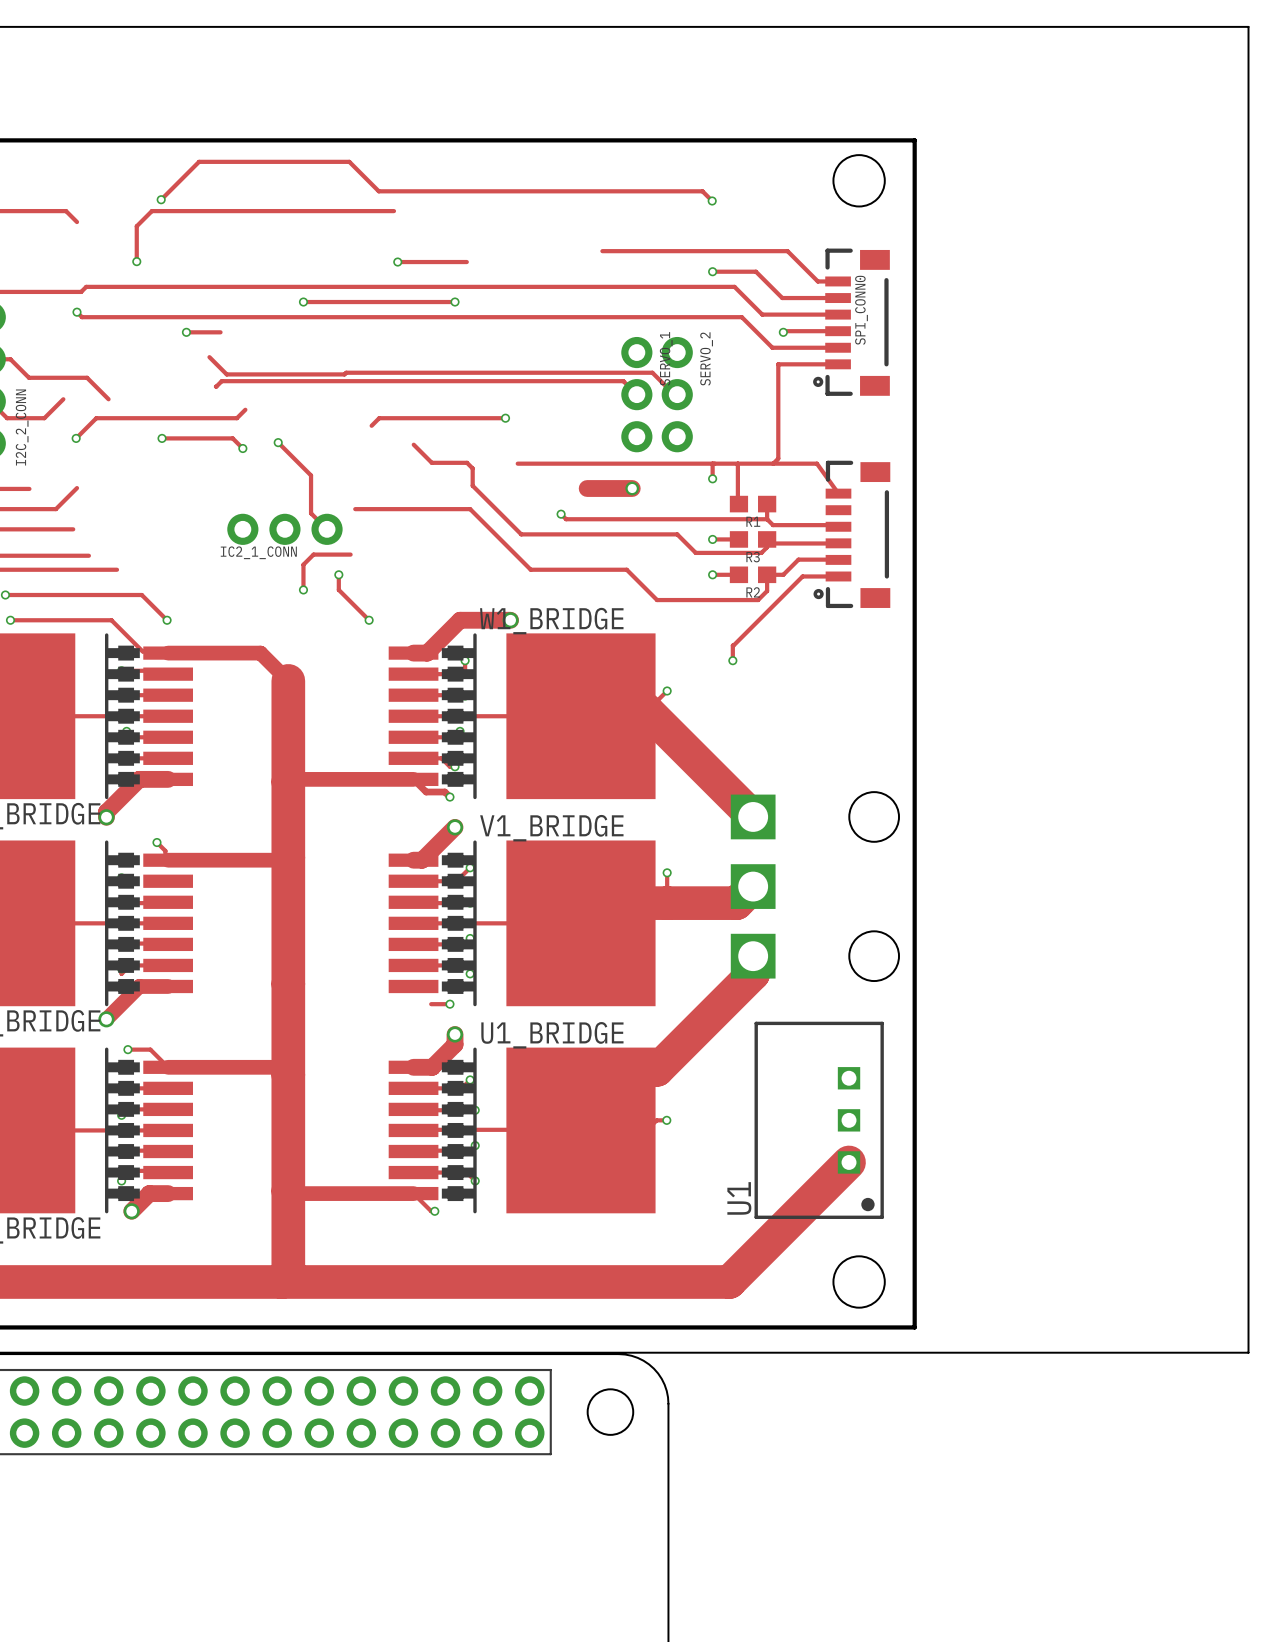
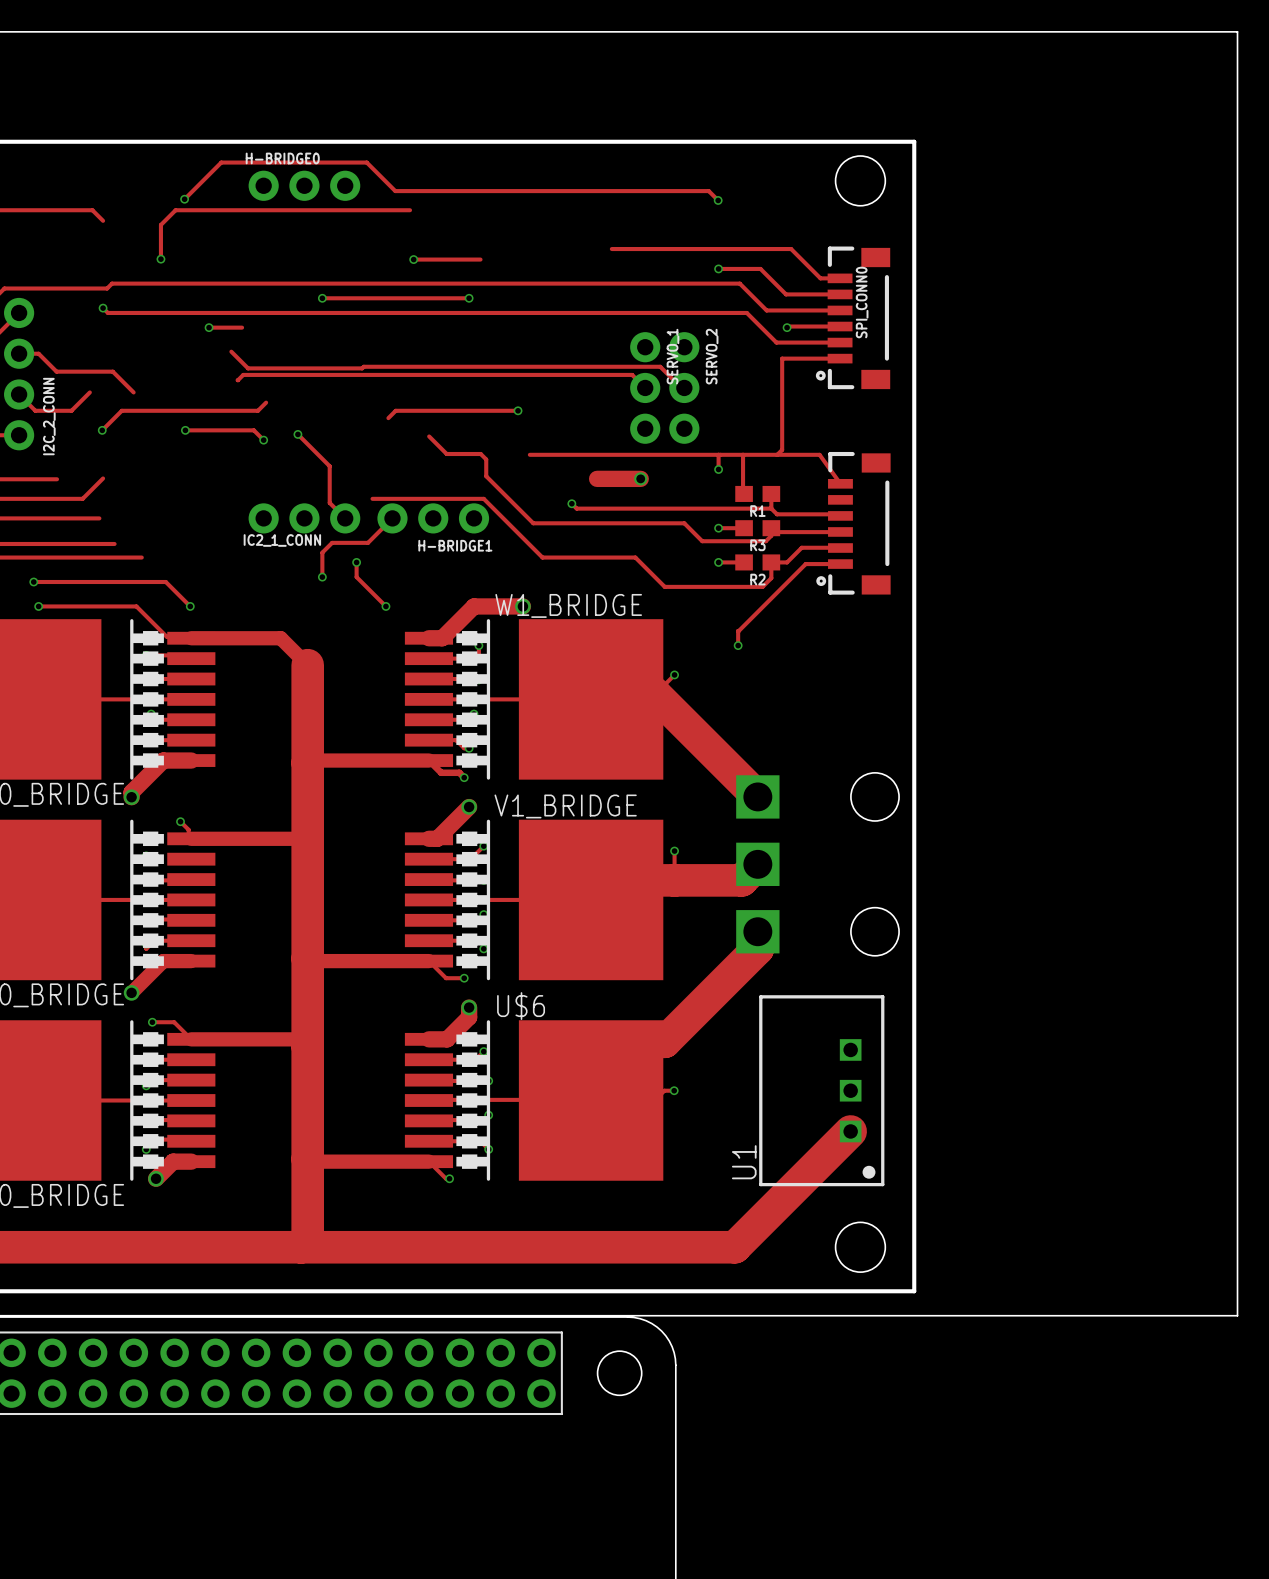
H-BRIDGE0: none -> (304, 185)
track: none -> (392, 518) (368, 542)
H-BRIDGE1: none -> (433, 518)
track: none -> (310, 961) (428, 961) (446, 978)
U1_BRIDGE name: U1_BRIDGE (552, 1035) -> U$6 (521, 1006)

